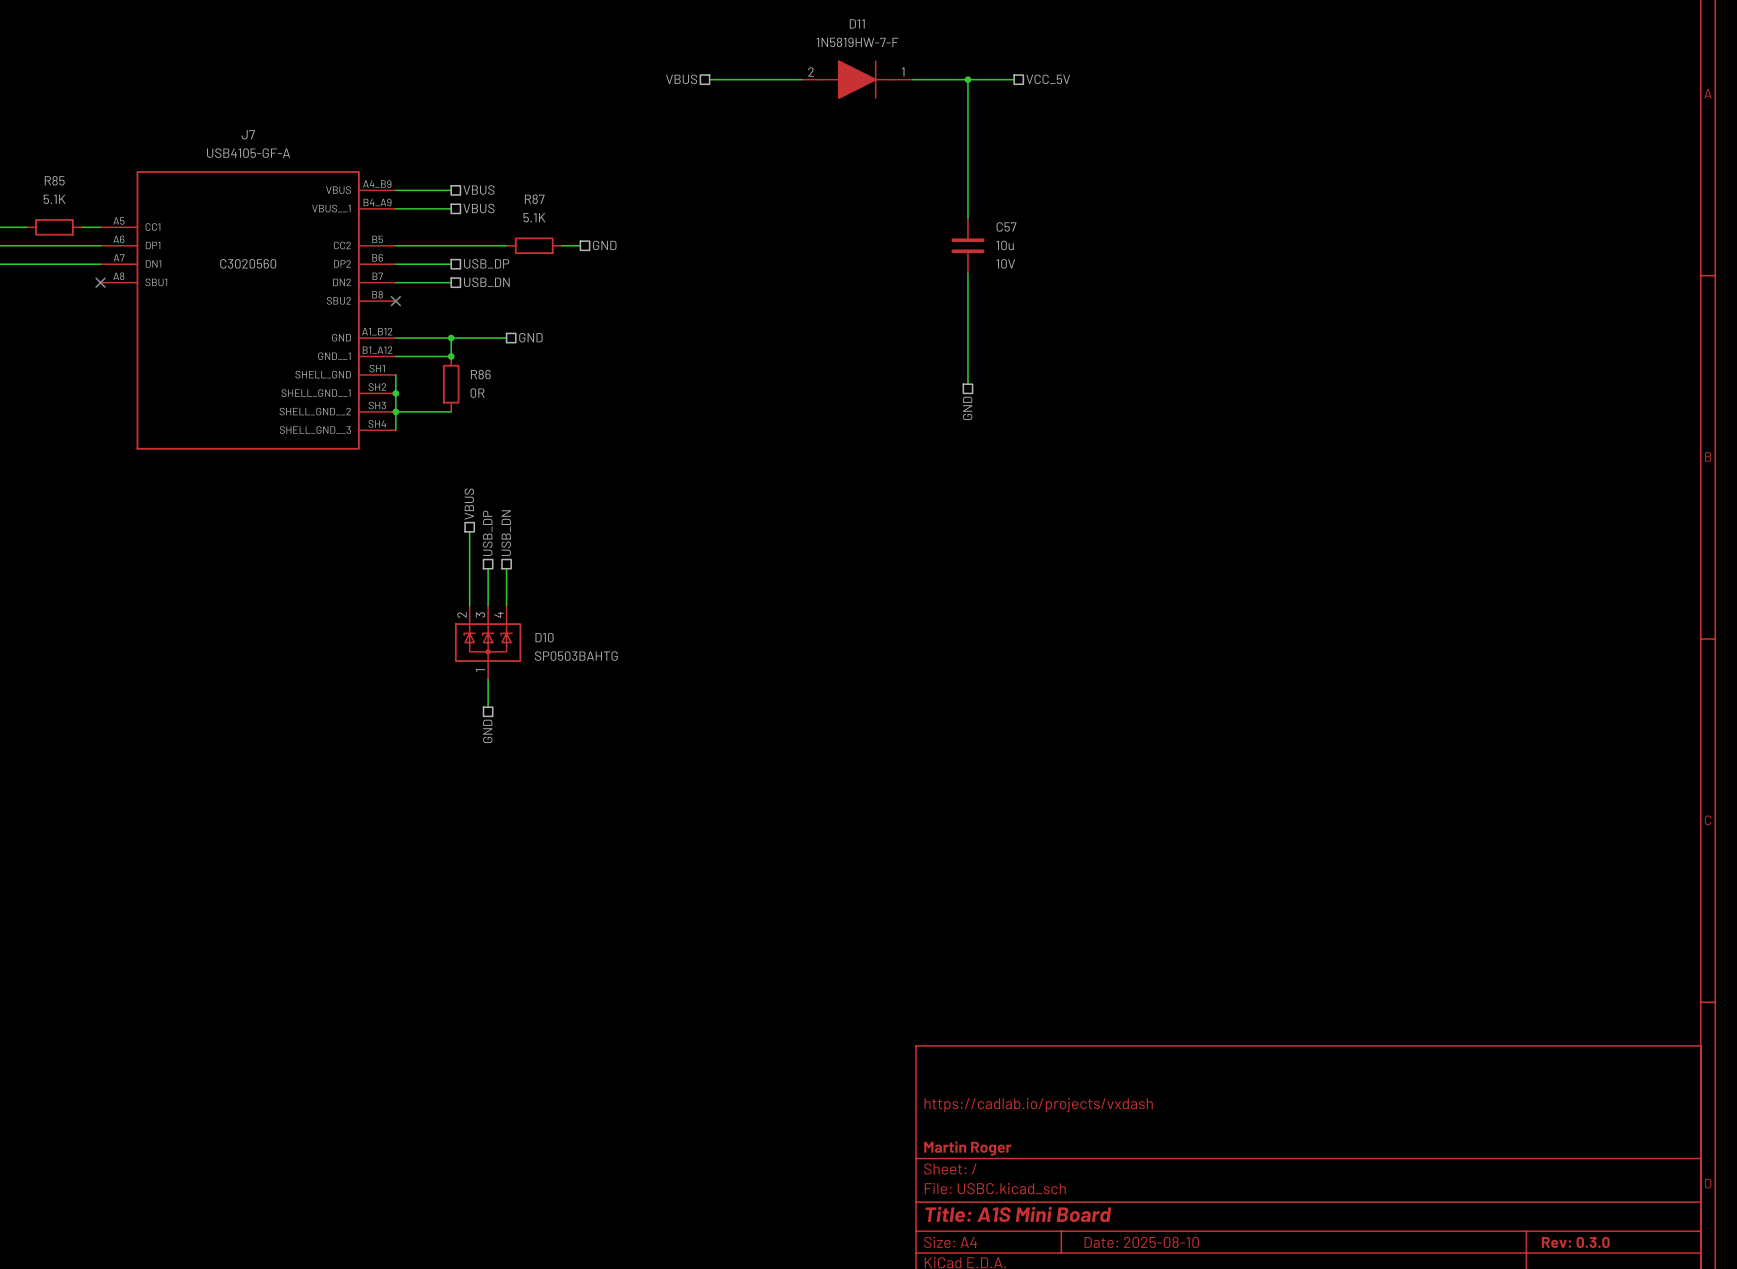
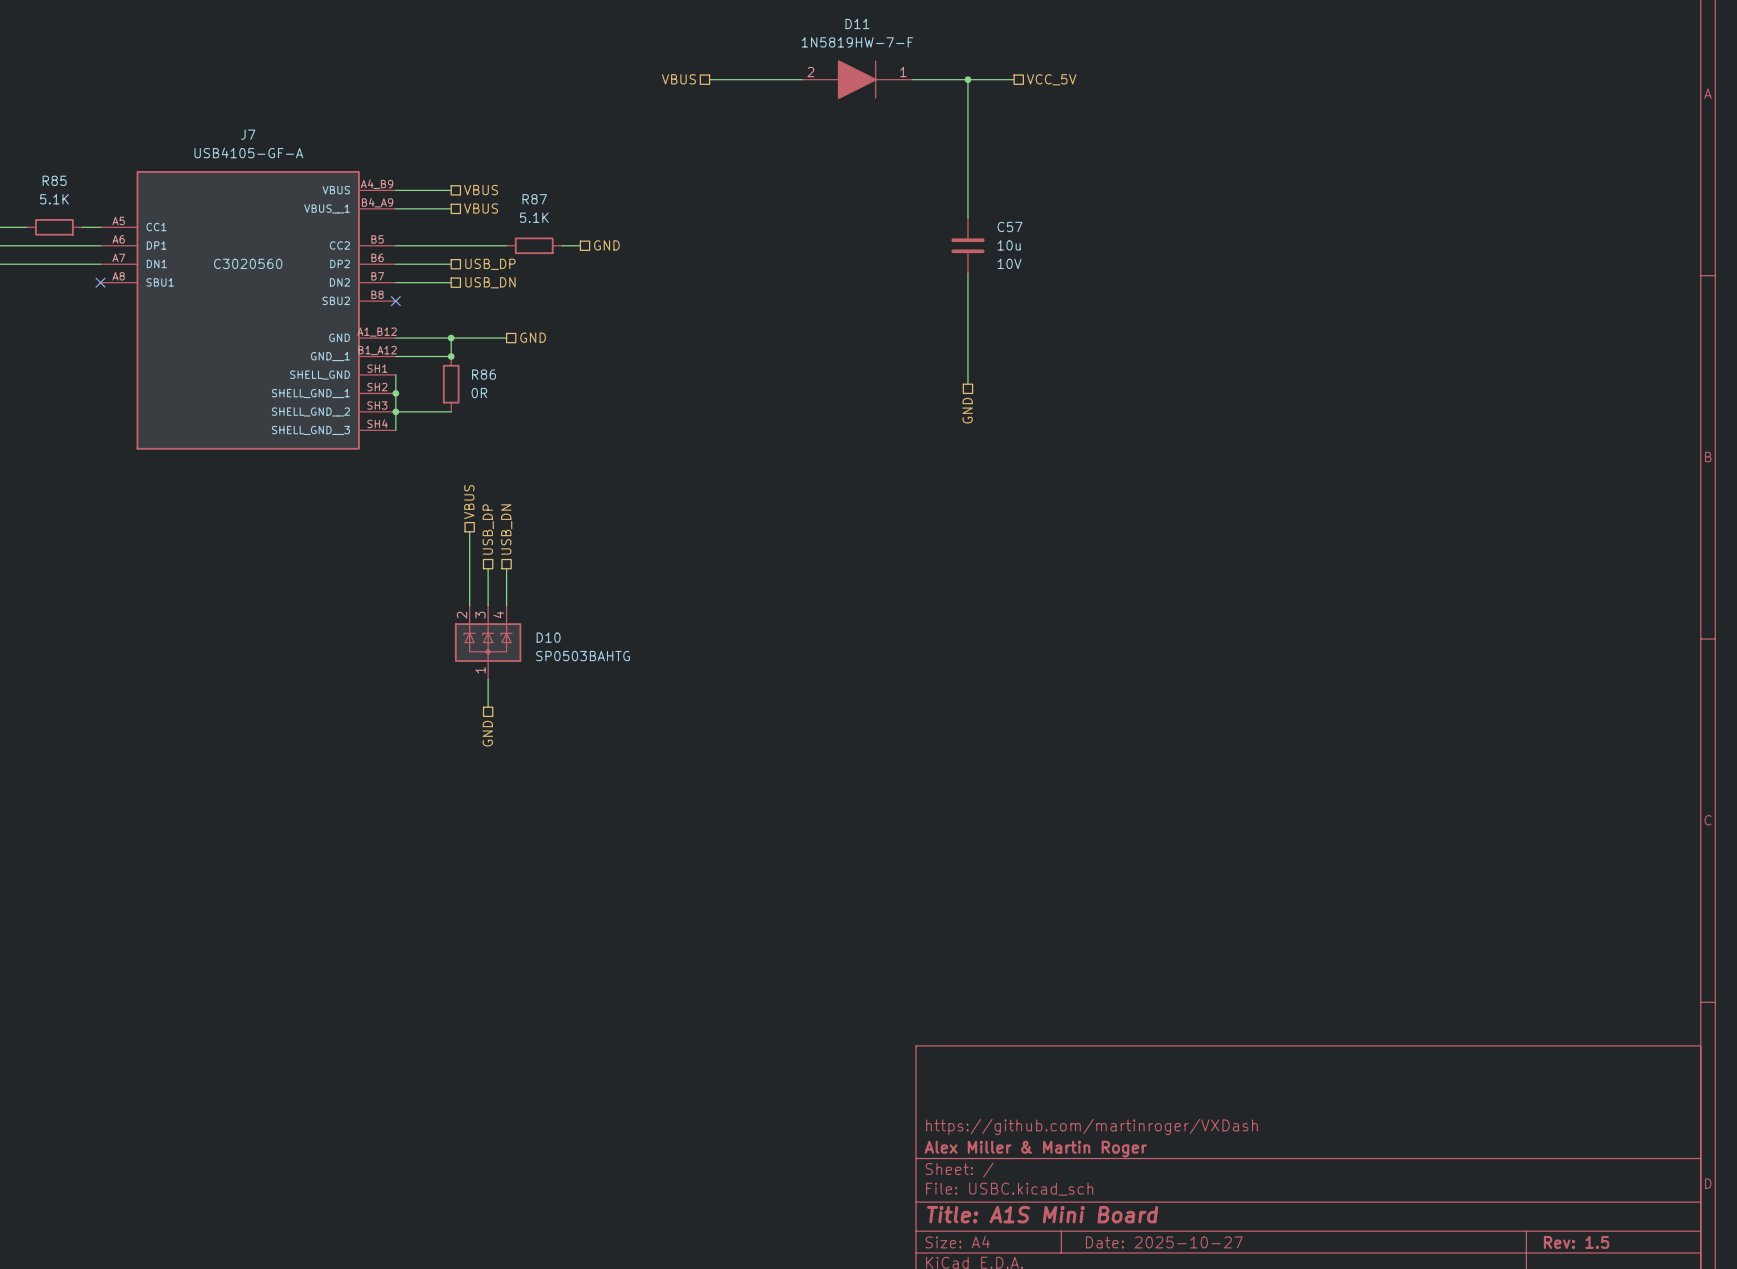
title block: https://cadlab.io/projects/vxdash (1038, 1105) -> none
title block: none -> https://github.com/martinroger/VXDash (1091, 1126)
title block: Martin Roger (967, 1148) -> Alex Miller & Martin Roger (1035, 1149)
title block: Date: 2025-08-10 (1141, 1242) -> Date: 2025-10-27 (1164, 1242)
title block: Rev: 0.3.0 (1575, 1242) -> Rev: 1.5 (1576, 1242)

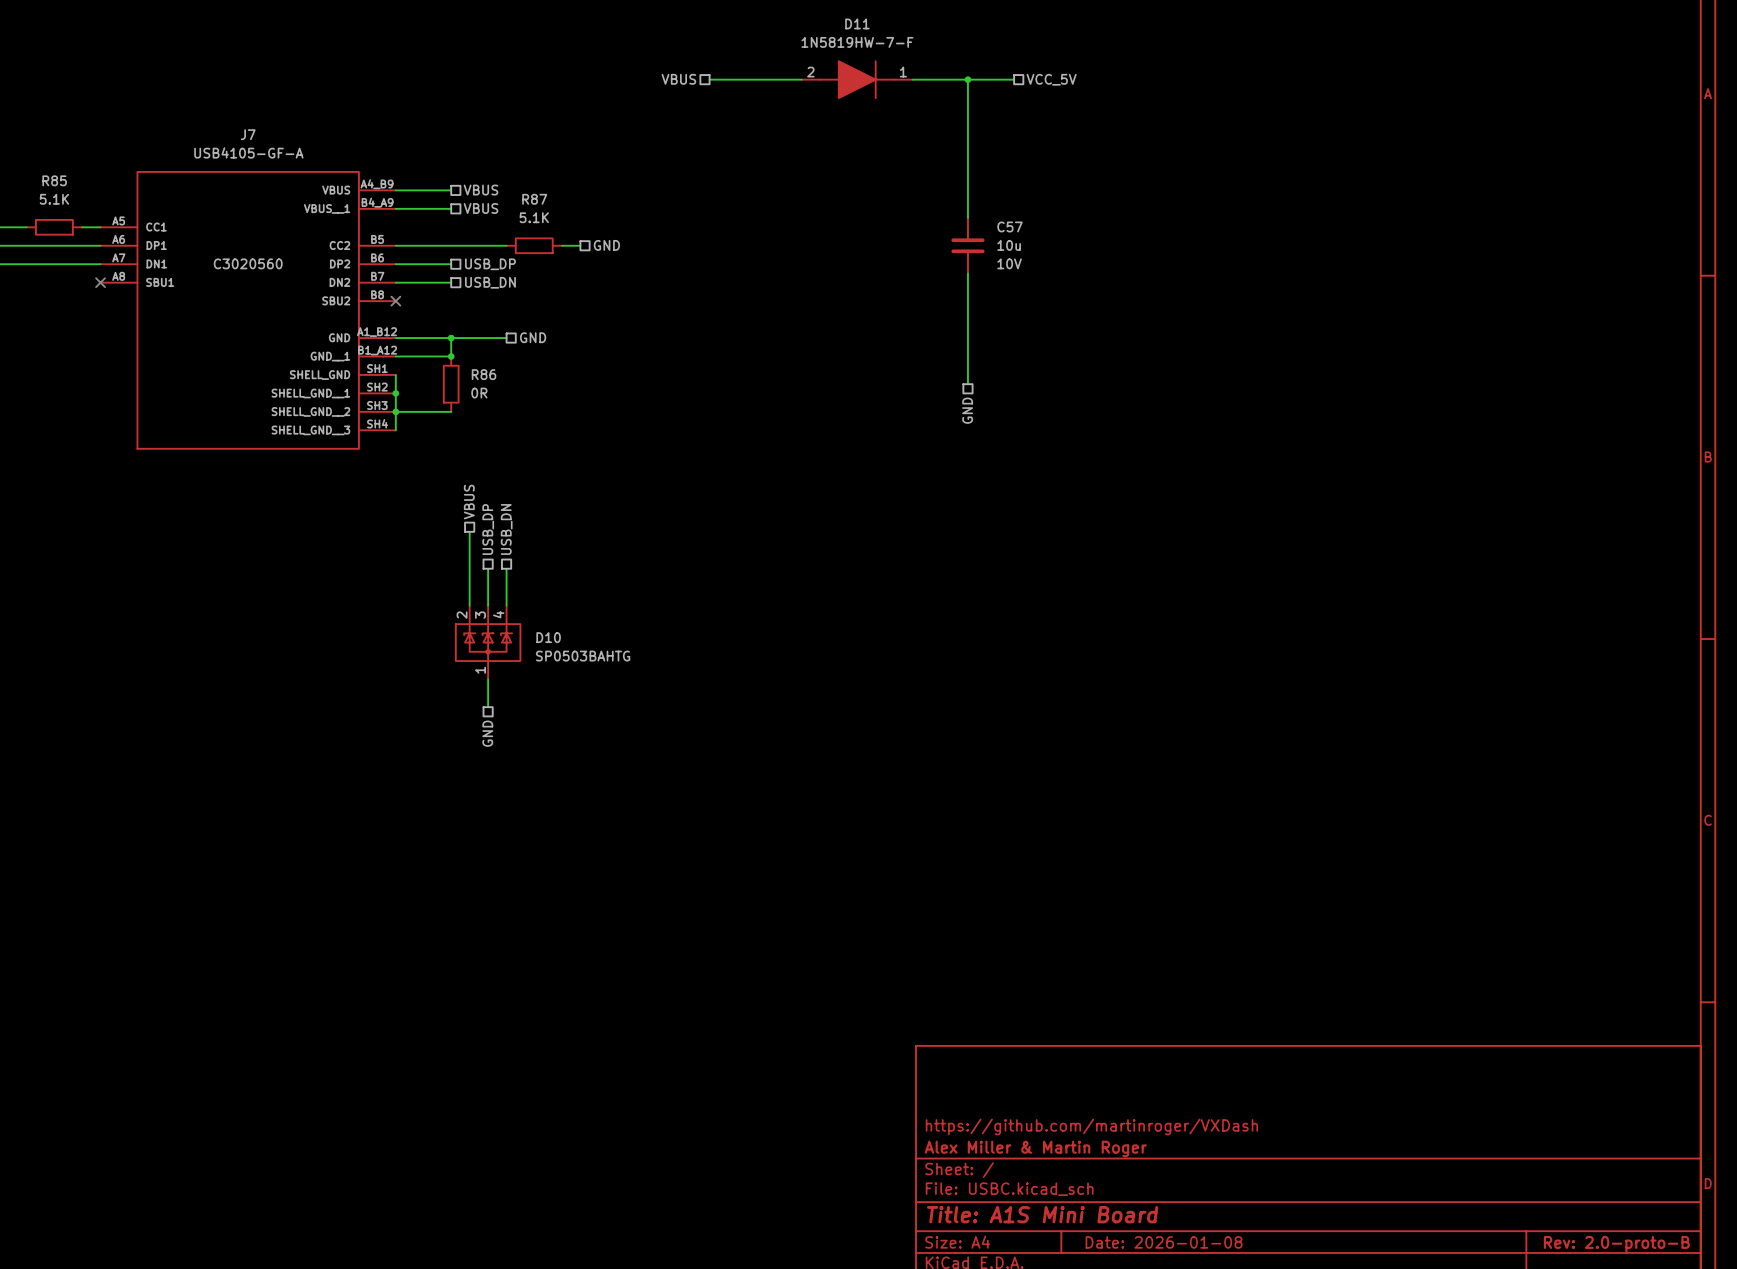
title block: Date: 2025-10-27 (1164, 1242) -> Date: 2026-01-08 (1164, 1242)
title block: Rev: 1.5 (1576, 1242) -> Rev: 2.0-proto-B (1616, 1244)

